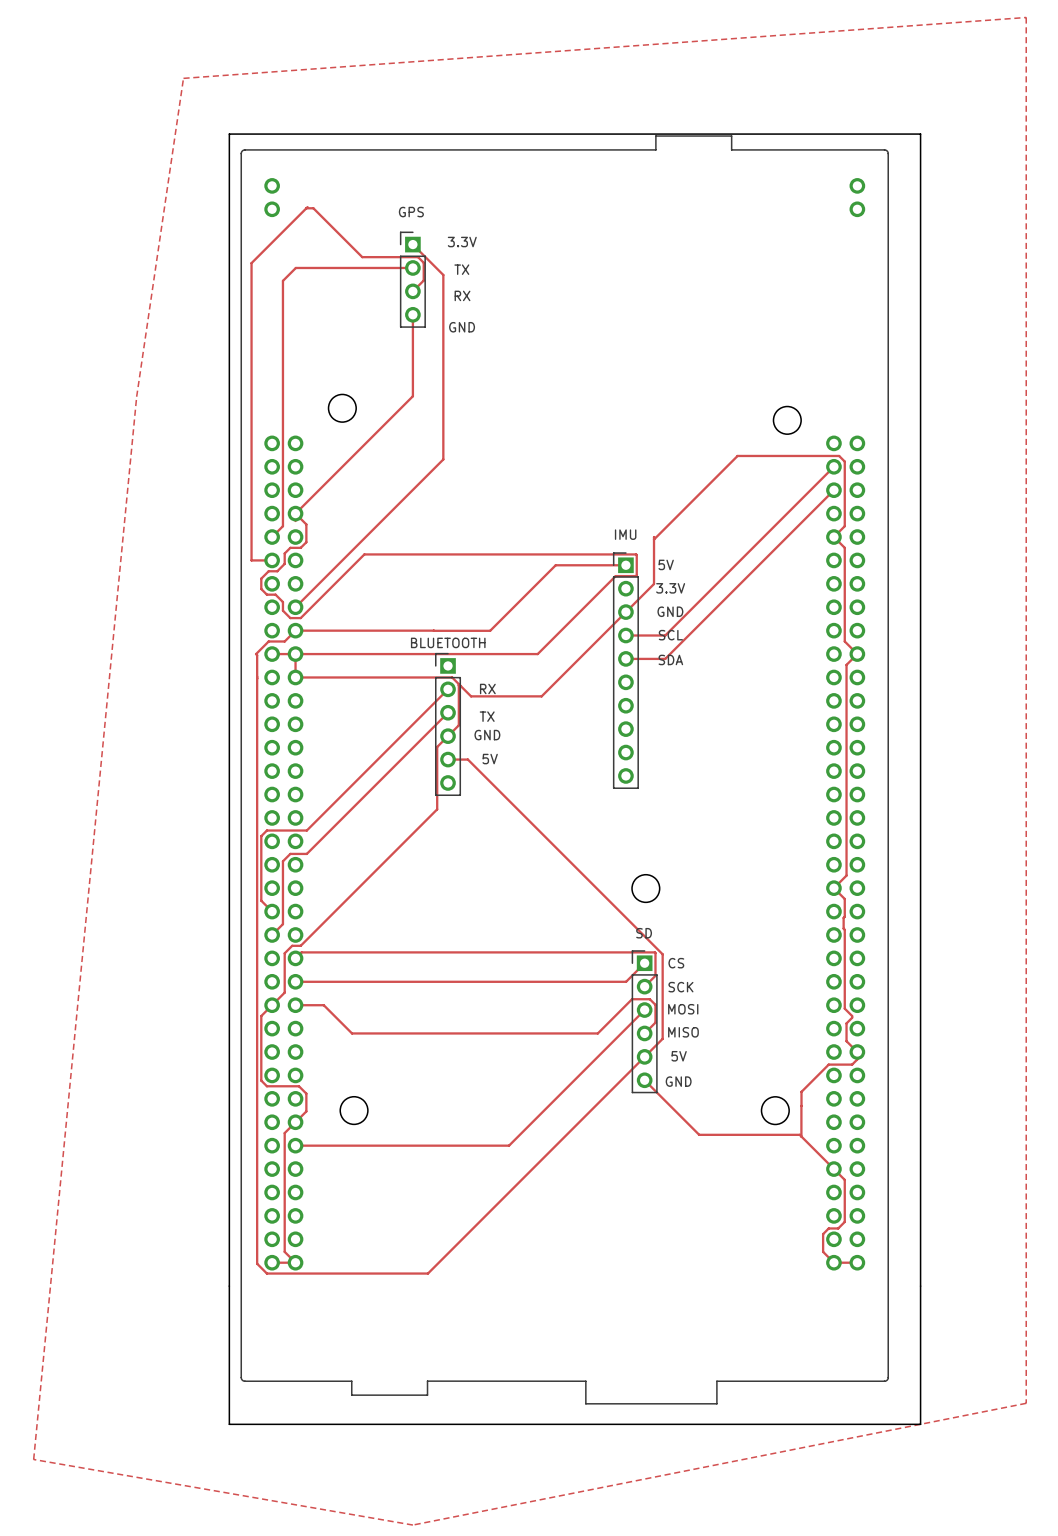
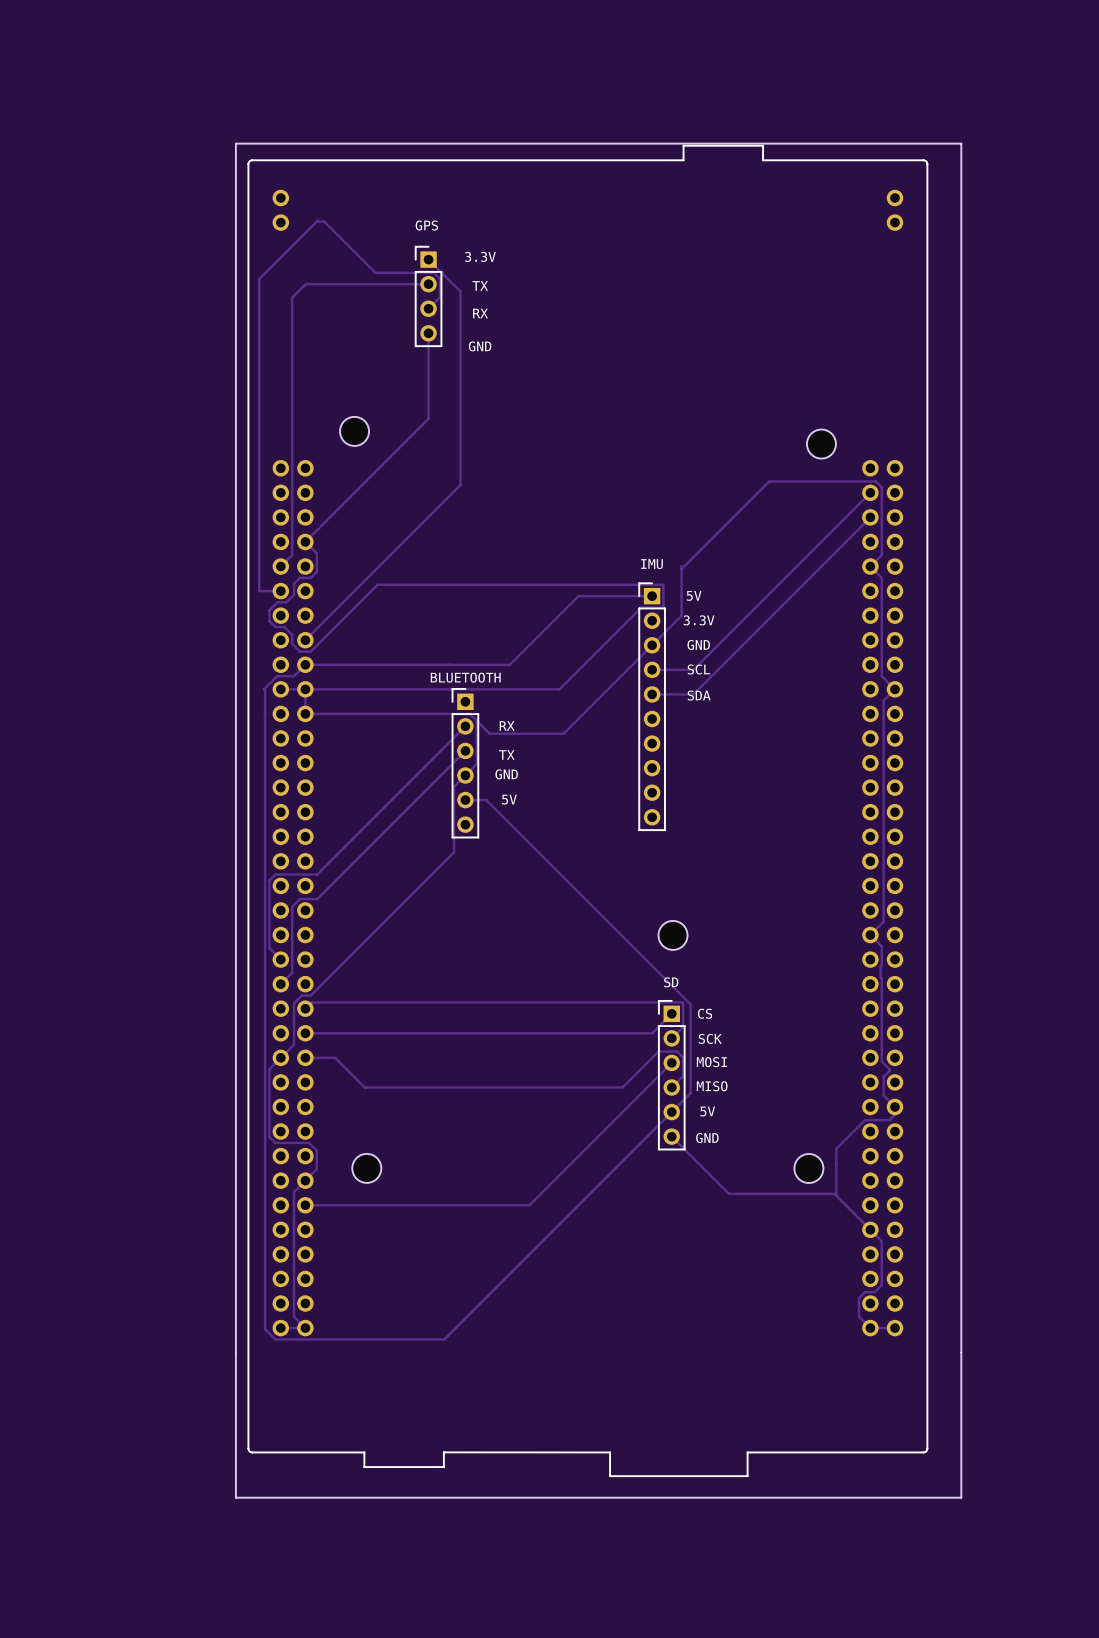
zone outline: (1026, 17) (183, 78) (136, 396) (33, 1459) (412, 1525) (1026, 1403) (1026, 17) -> none

